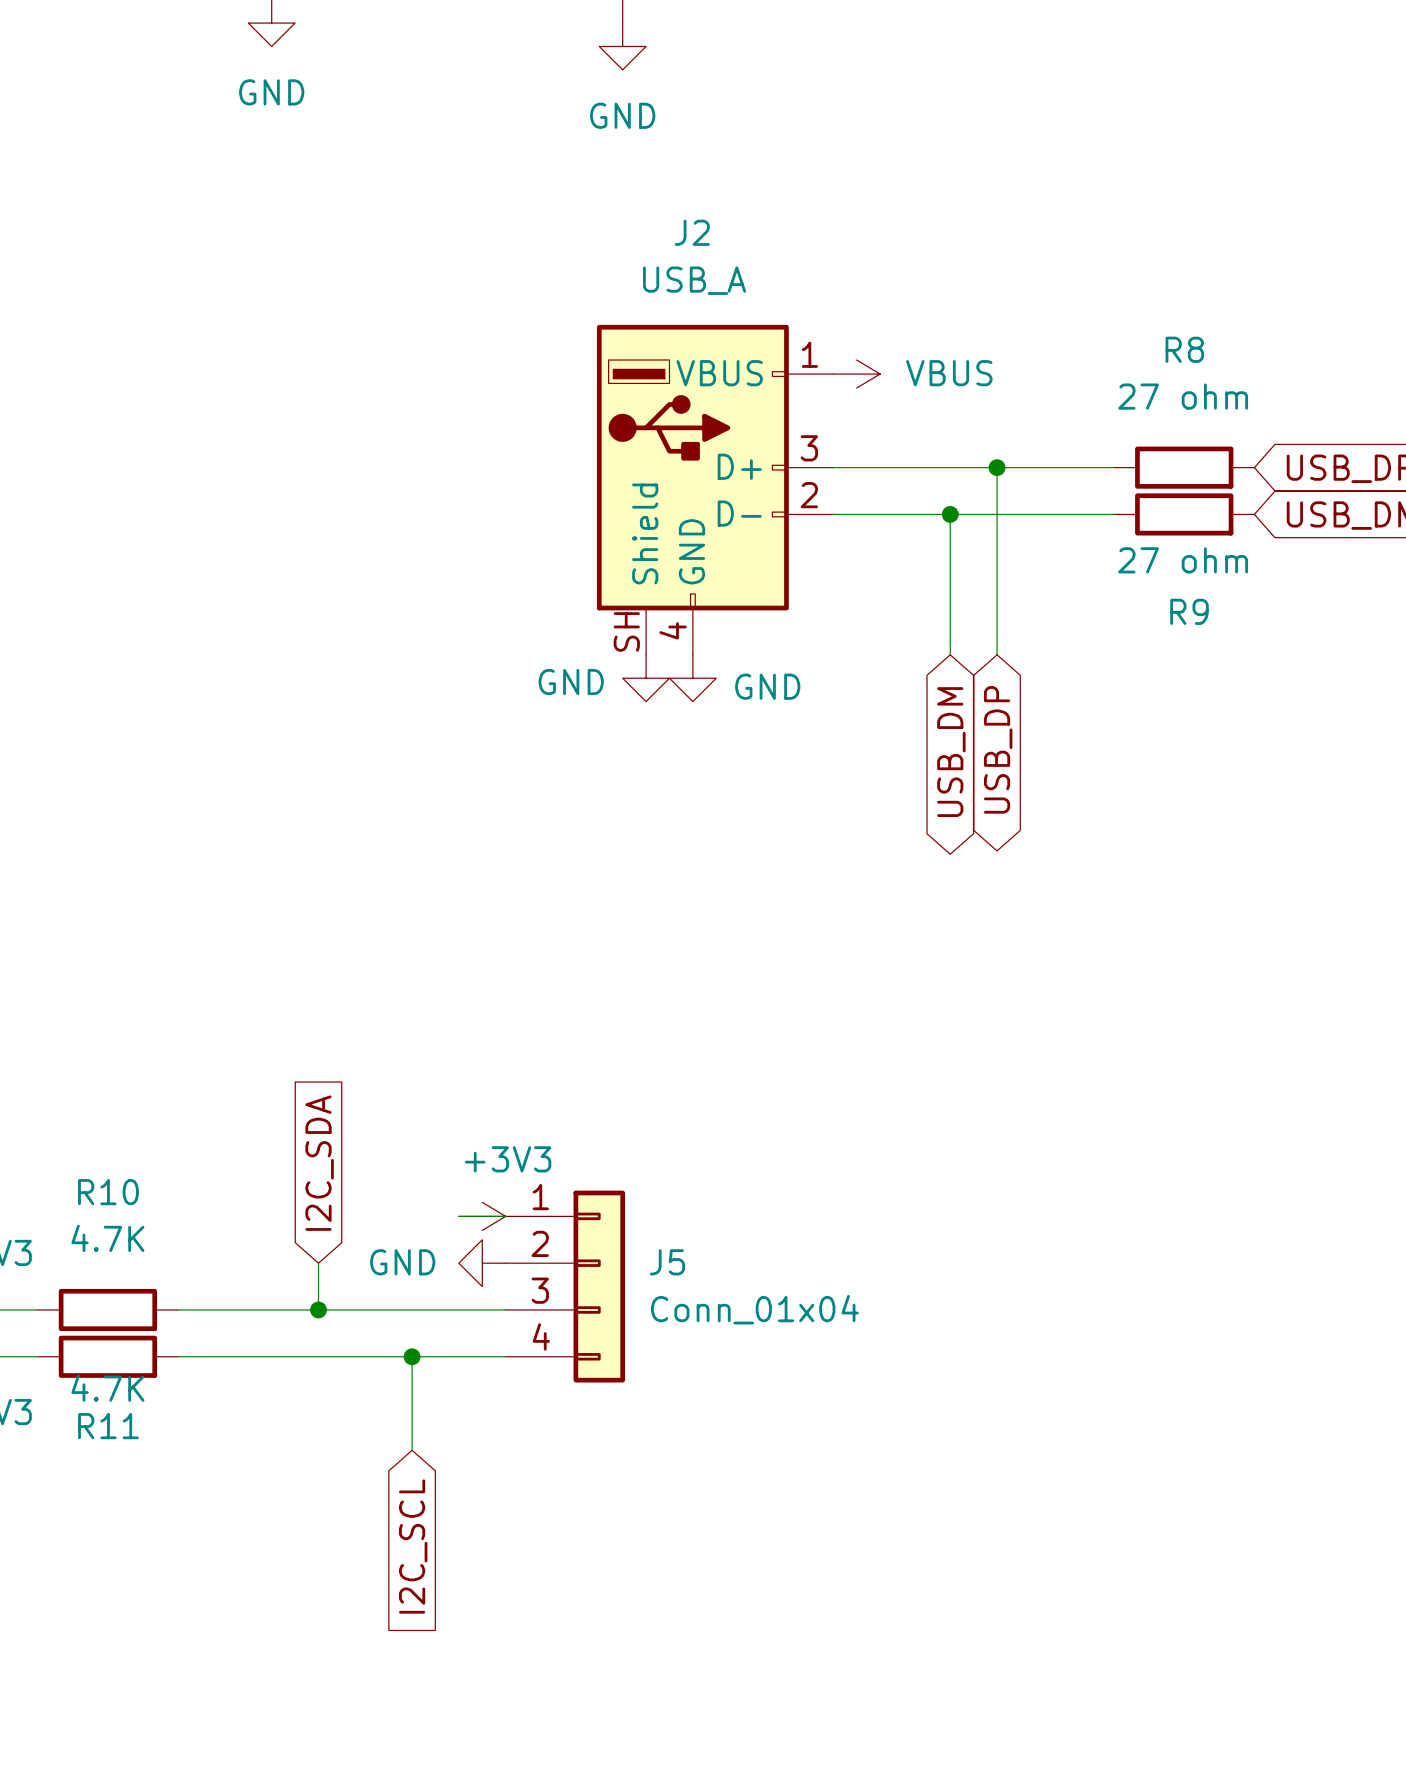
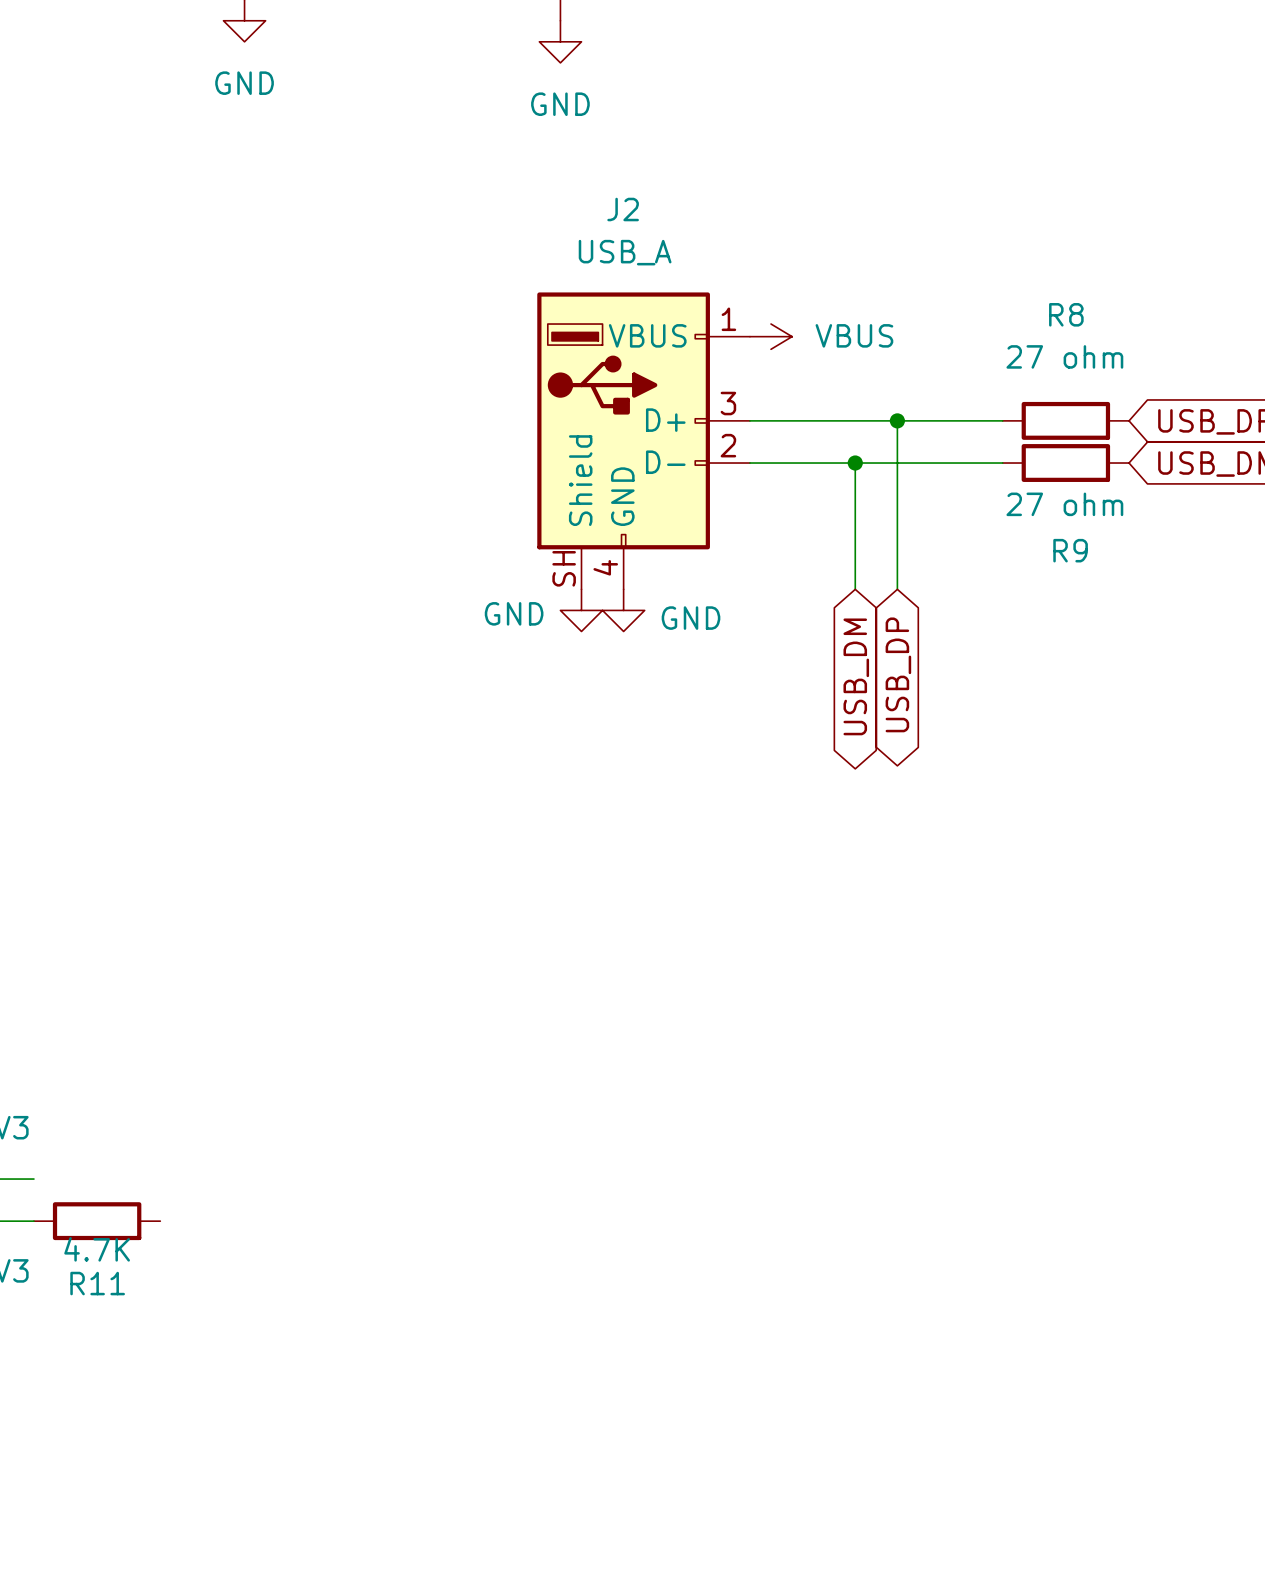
global label: I2C_SDA (319, 1163) -> none
wire: (458, 1216) (505, 1216) -> none
power symbol: +3V3 (482, 1216) -> none
wire: (318, 1263) (318, 1309) -> none
power symbol: GND (482, 1263) -> none
J5: Conn_01x04 (565, 1286) -> none
R10: 4.7K (107, 1309) -> none
wire: (178, 1309) (505, 1309) -> none
junction: (318, 1309) -> none
wire: (178, 1356) (505, 1356) -> none
wire: (412, 1356) (412, 1450) -> none
junction: (412, 1356) -> none
global label: I2C_SCL (413, 1546) -> none

